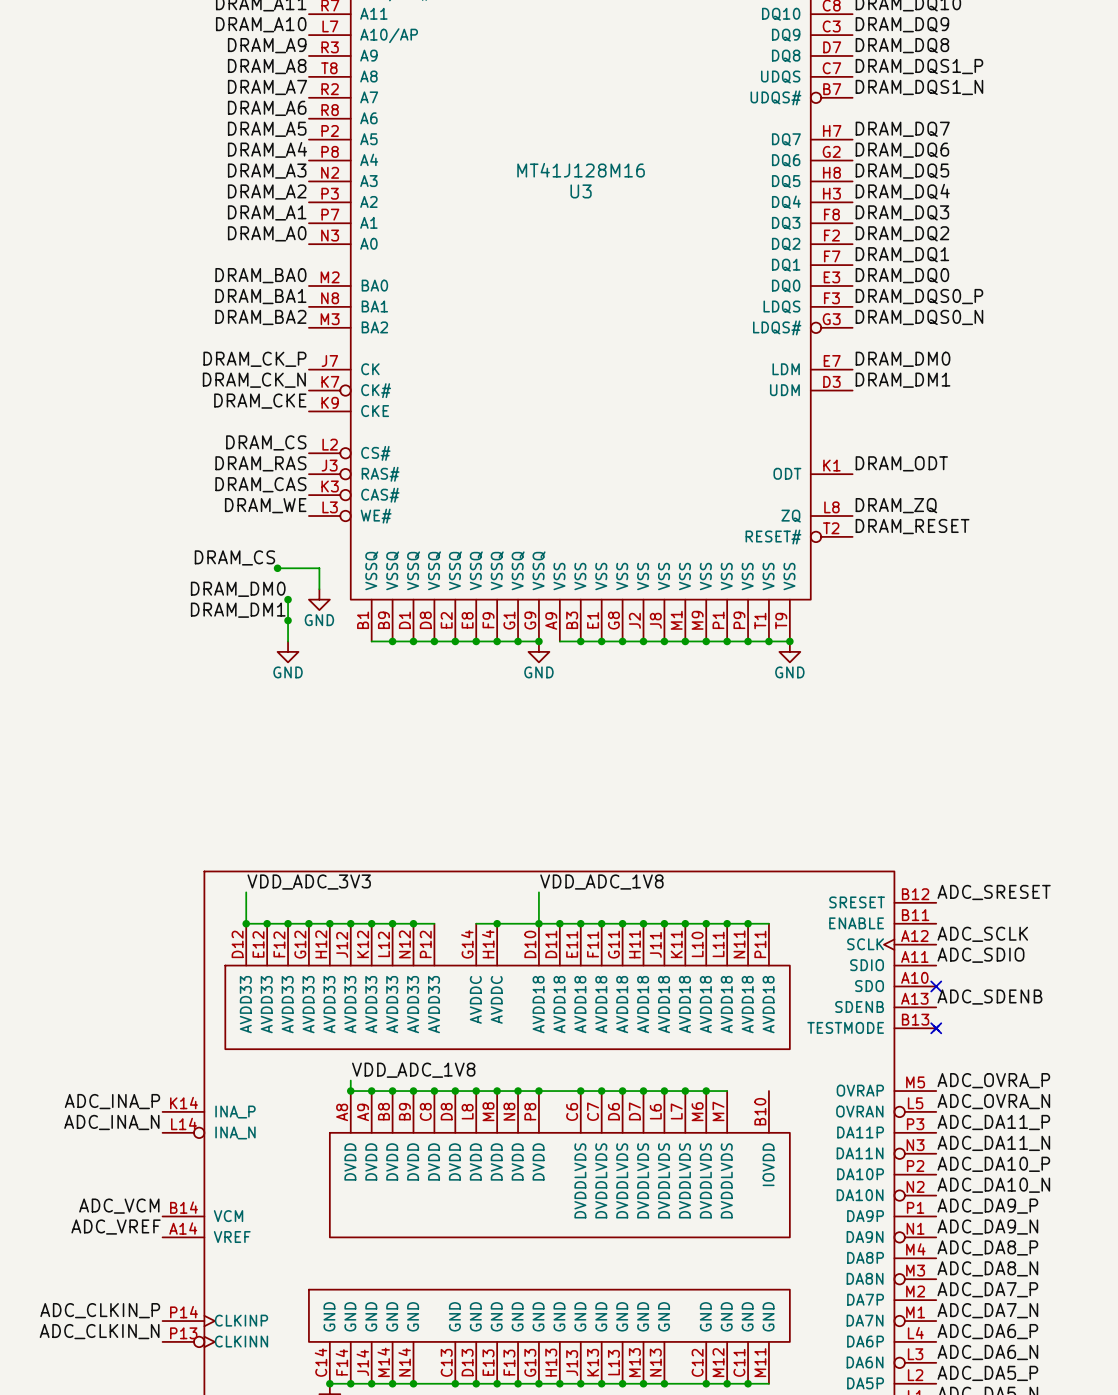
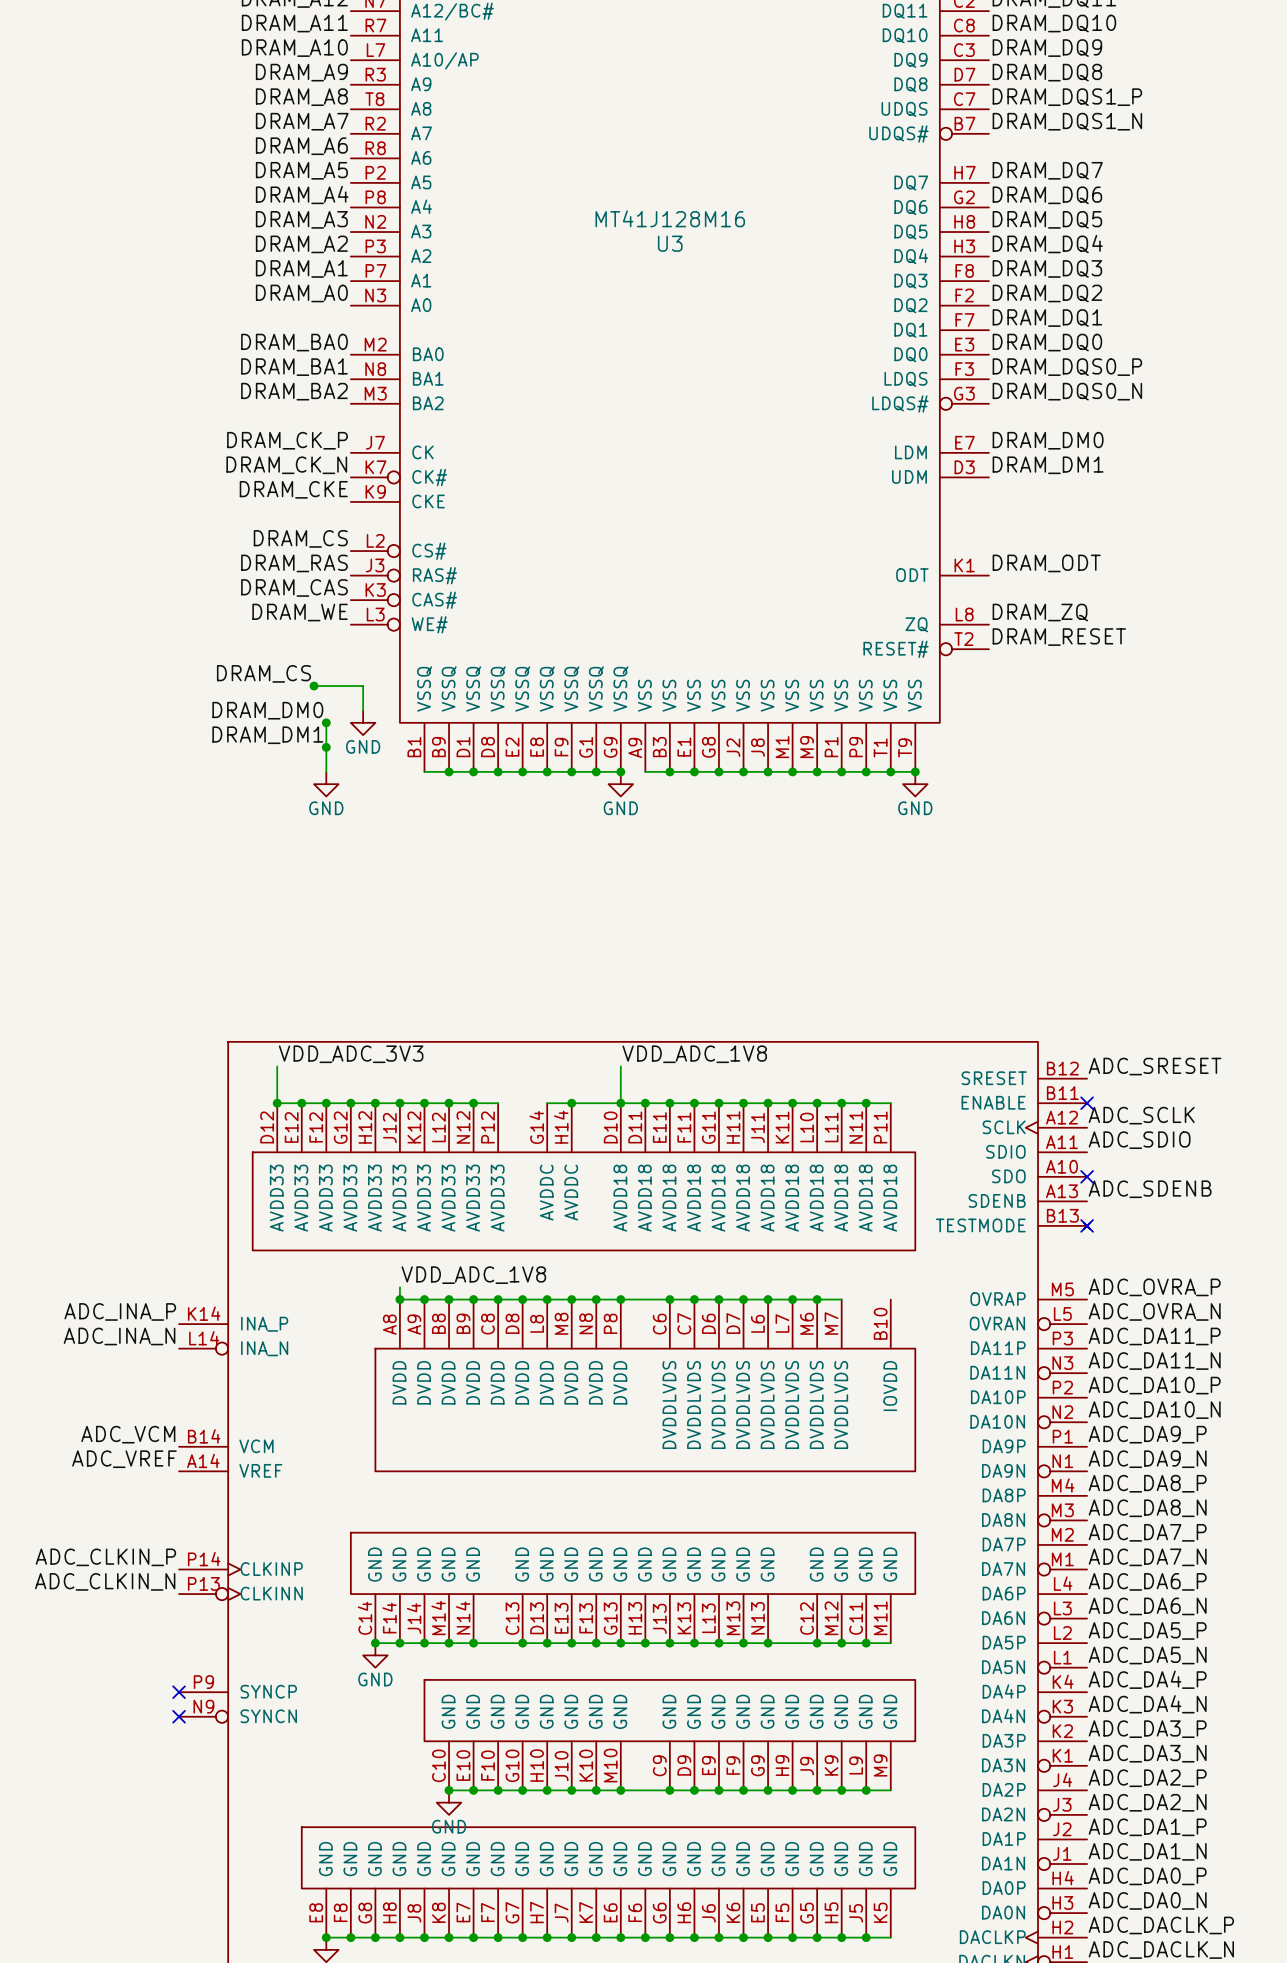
no-connect mark: none -> (1087, 1103)

